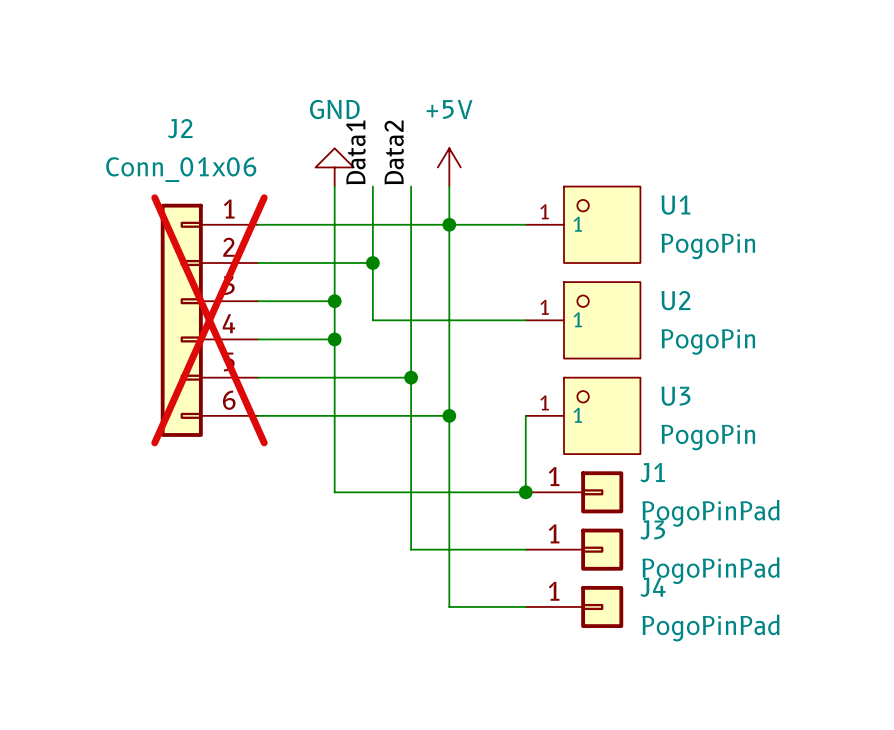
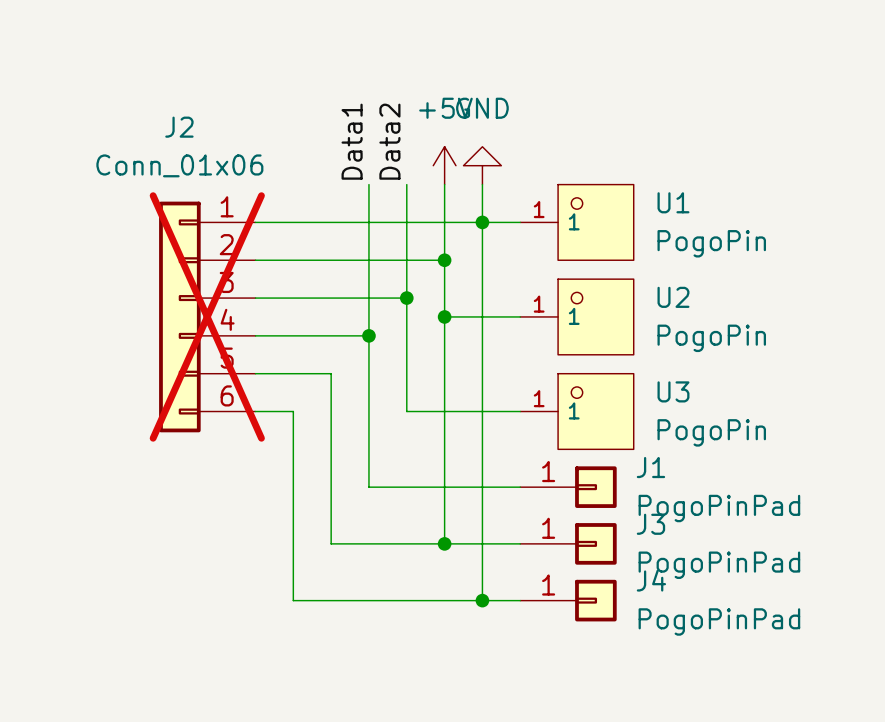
power symbol position: GND (334, 167) -> GND (482, 165)
wire: (334, 186) (334, 377) (411, 377) -> none
wire: none -> (482, 184) (482, 600)
junction: (449, 224) -> none
junction: none -> (482, 222)
wire: none -> (368, 260) (444, 260)
junction: (372, 263) -> none
junction: none -> (444, 260)
wire: none -> (331, 298) (406, 298)
junction: (334, 301) -> none
junction: none -> (406, 298)
wire: (372, 320) (449, 320) -> (368, 316) (368, 487)
junction: none -> (444, 316)
wire: none -> (331, 335) (368, 335)
junction: (334, 339) -> none
junction: none -> (368, 335)
junction: (411, 377) -> none
wire: (296, 415) (411, 415) (411, 549) -> (293, 411) (293, 600) (444, 600)
junction: (449, 415) -> none
wire: (525, 415) (525, 492) -> (520, 411) (444, 411)
wire: (334, 492) (372, 492) -> (331, 487) (331, 543) (406, 543)
junction: (525, 492) -> none
wire: (449, 549) (449, 606) -> none
junction: none -> (444, 543)
junction: none -> (482, 600)

